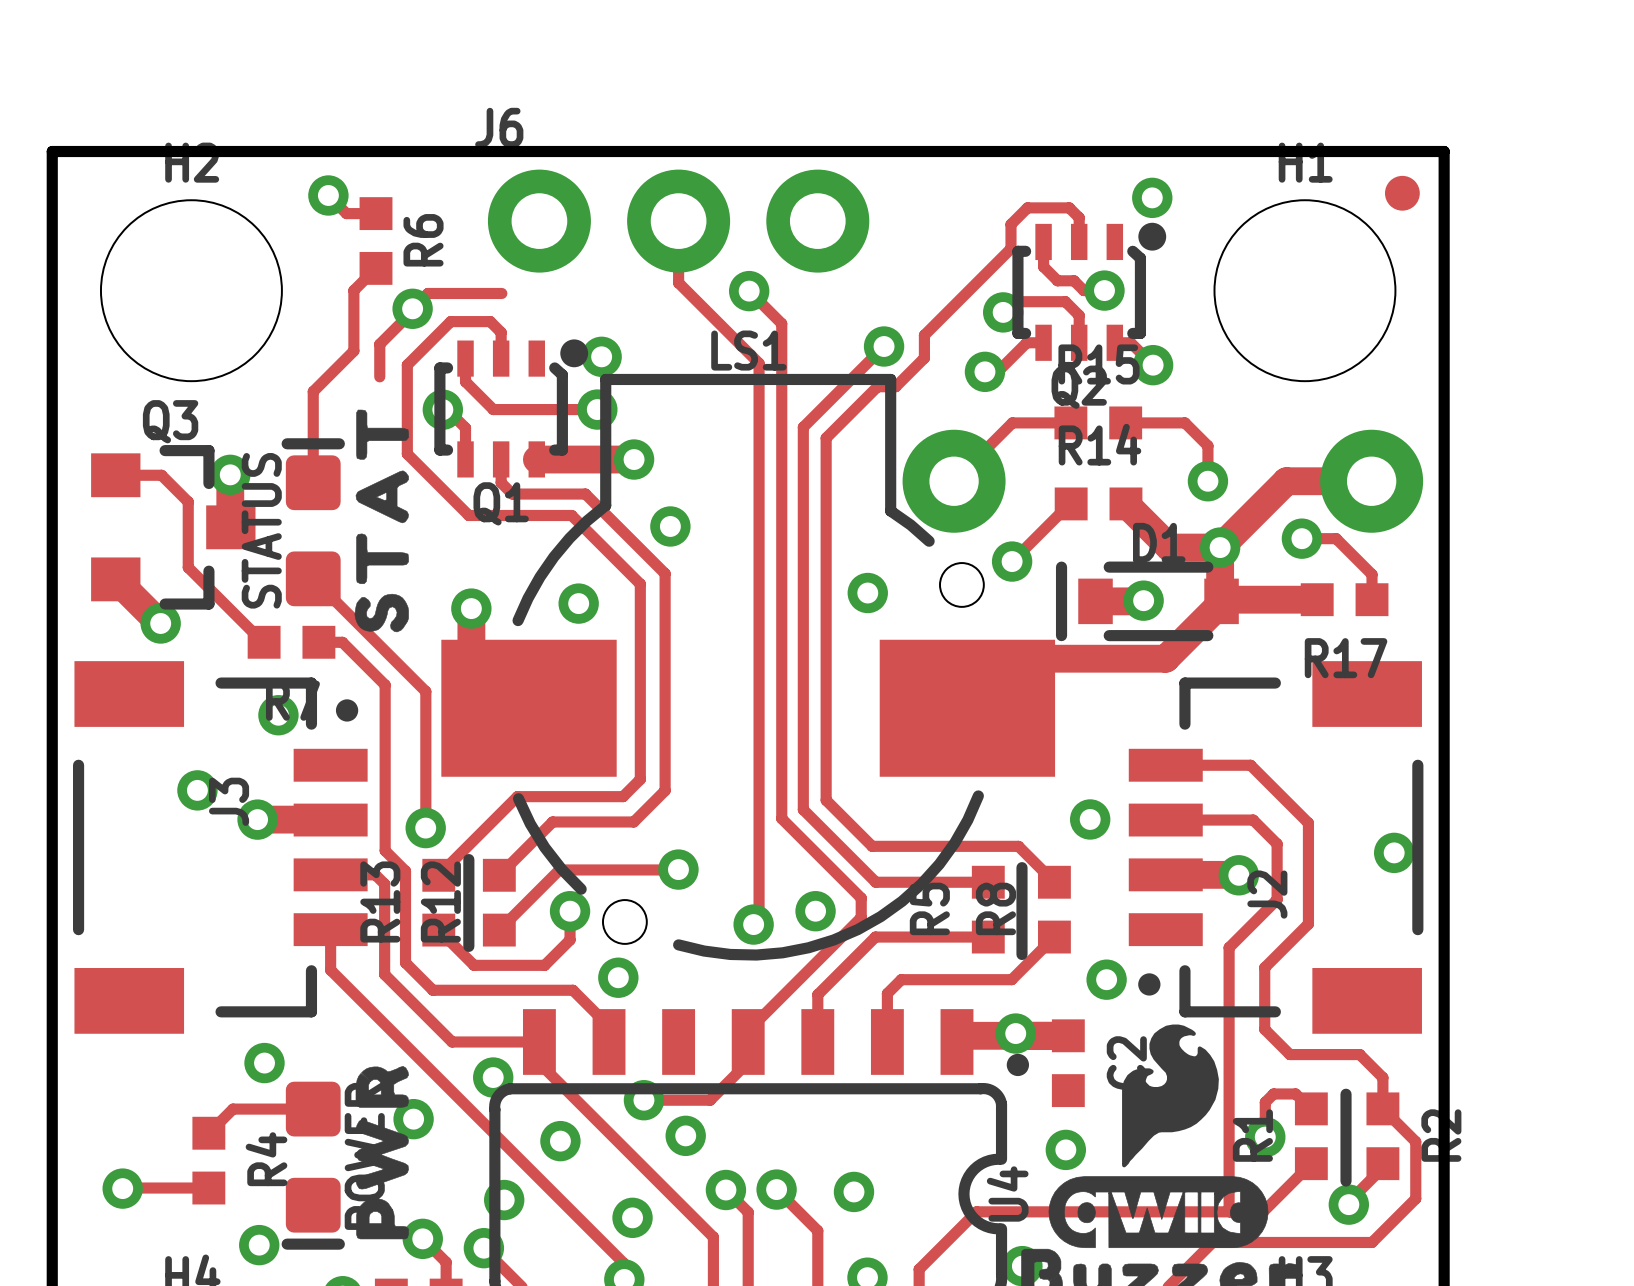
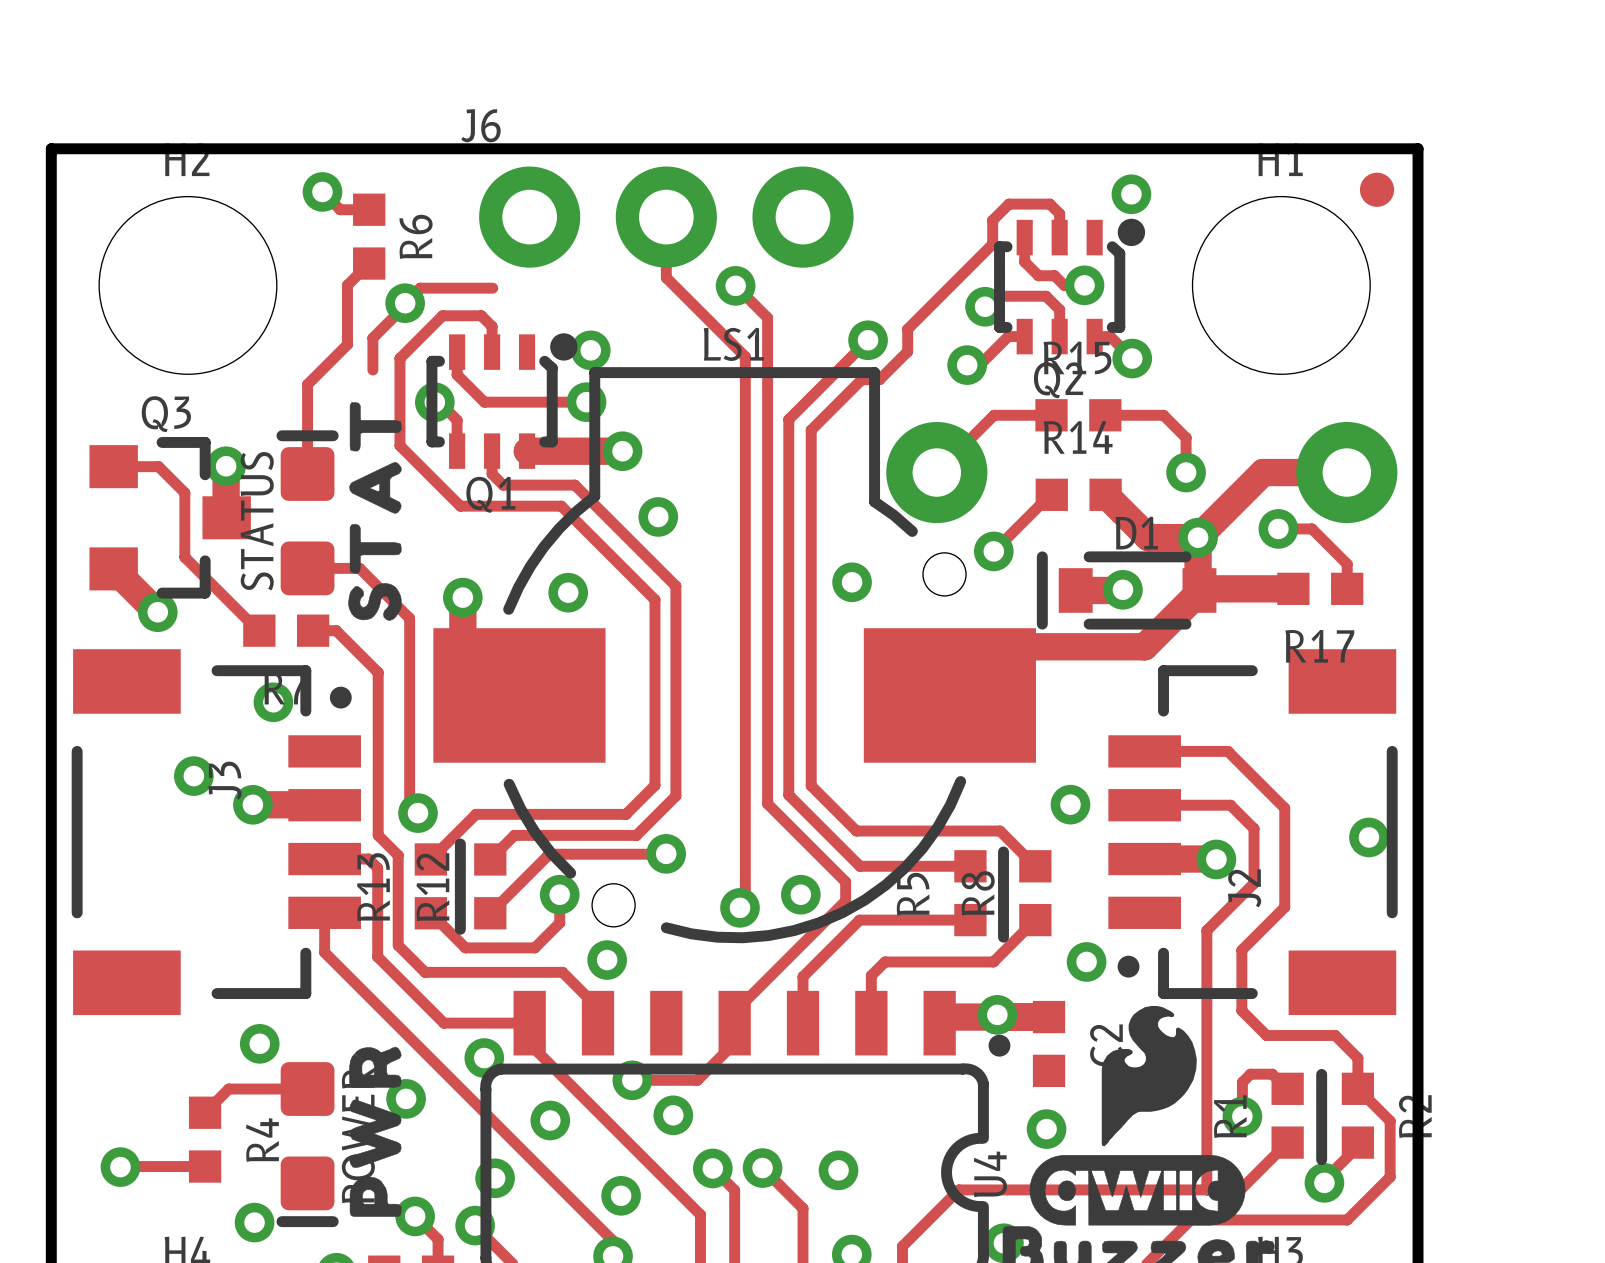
track: (665, 573) (665, 790) (633, 821) (552, 821) (523, 850) -> (653, 563) (675, 586) (675, 796) (636, 835) (514, 835)
track: (313, 578) (425, 691) (425, 827) -> (307, 568) (359, 568) (409, 618) (409, 802) (421, 813)
track: (640, 584) (640, 779) (623, 796) (517, 796) (484, 829) -> (628, 573) (654, 599) (654, 785) (626, 814) (475, 814)

